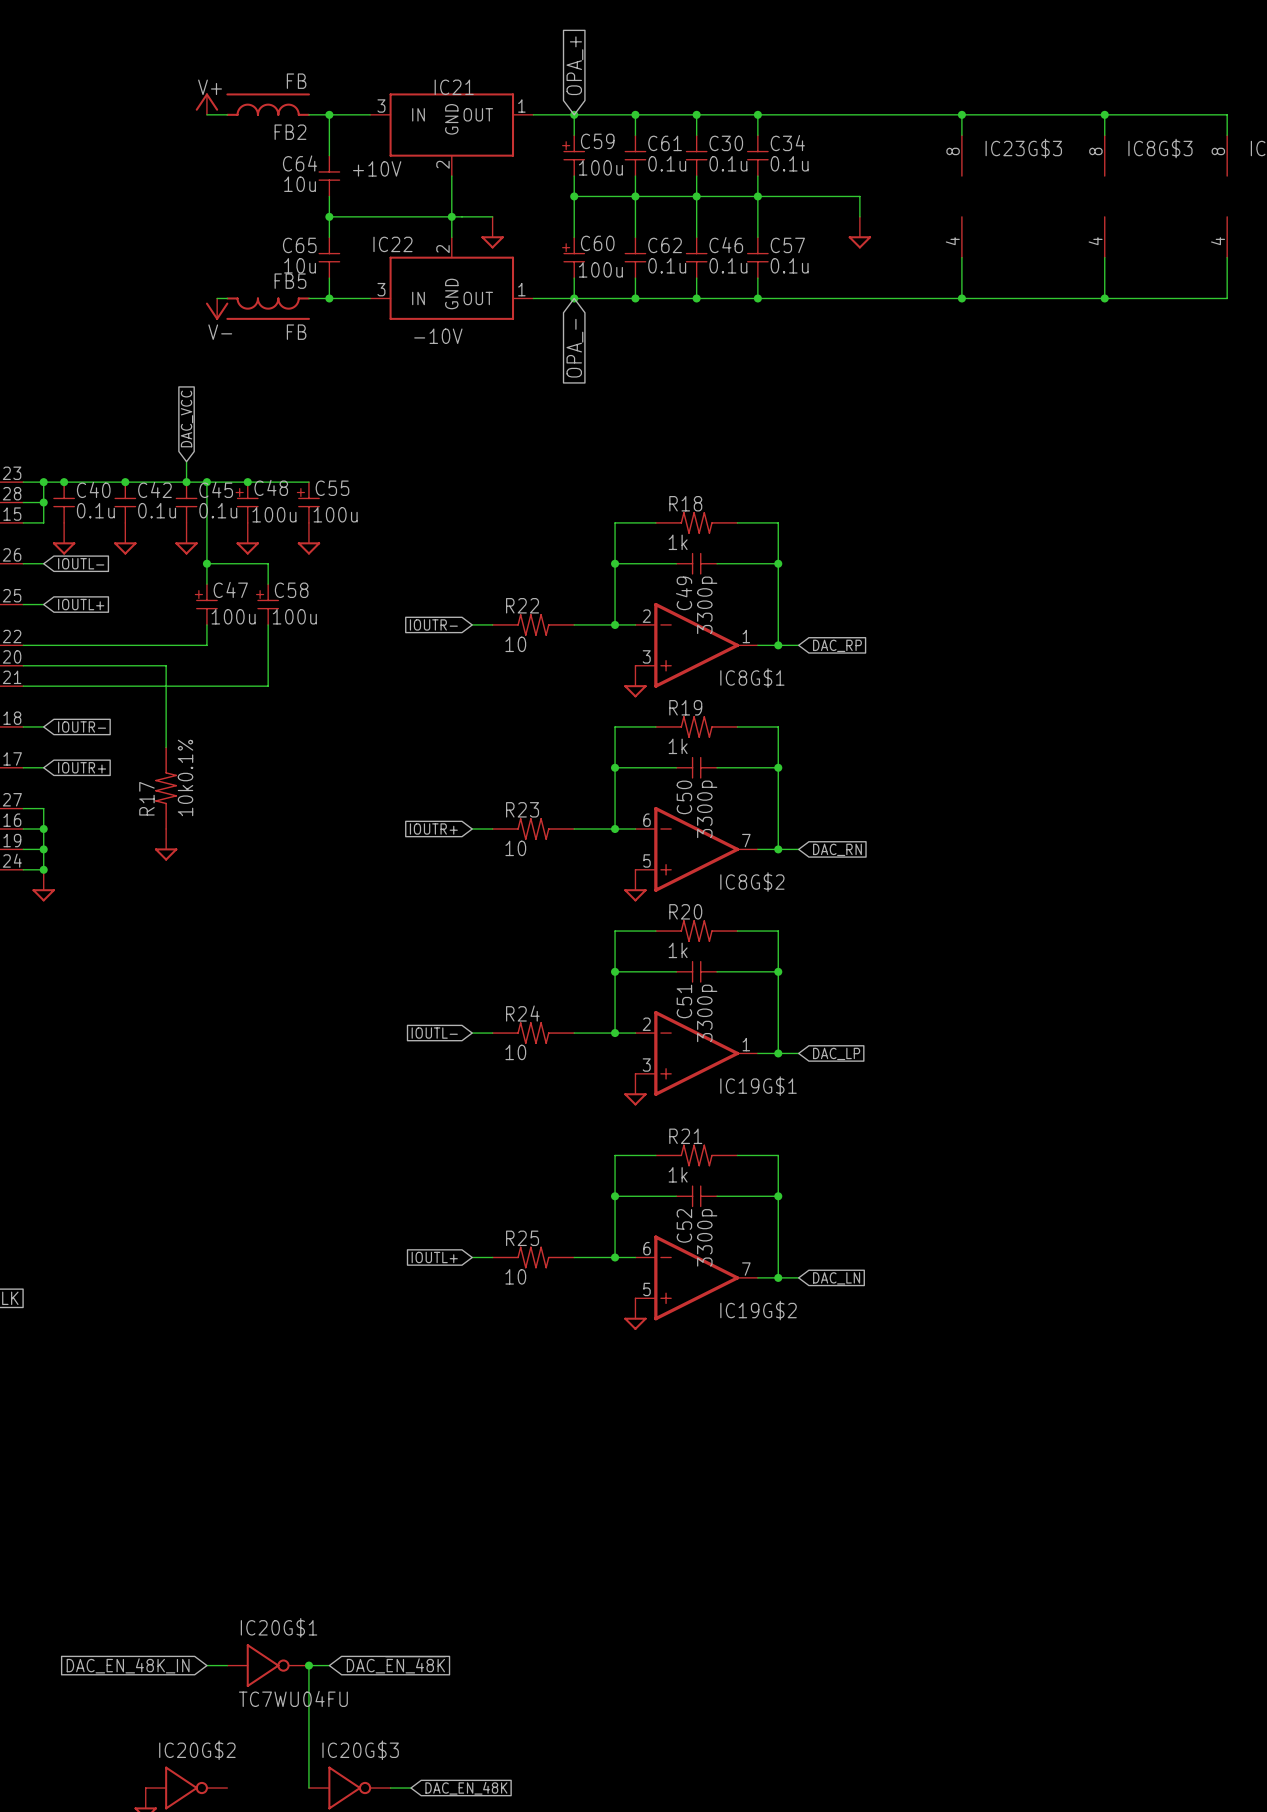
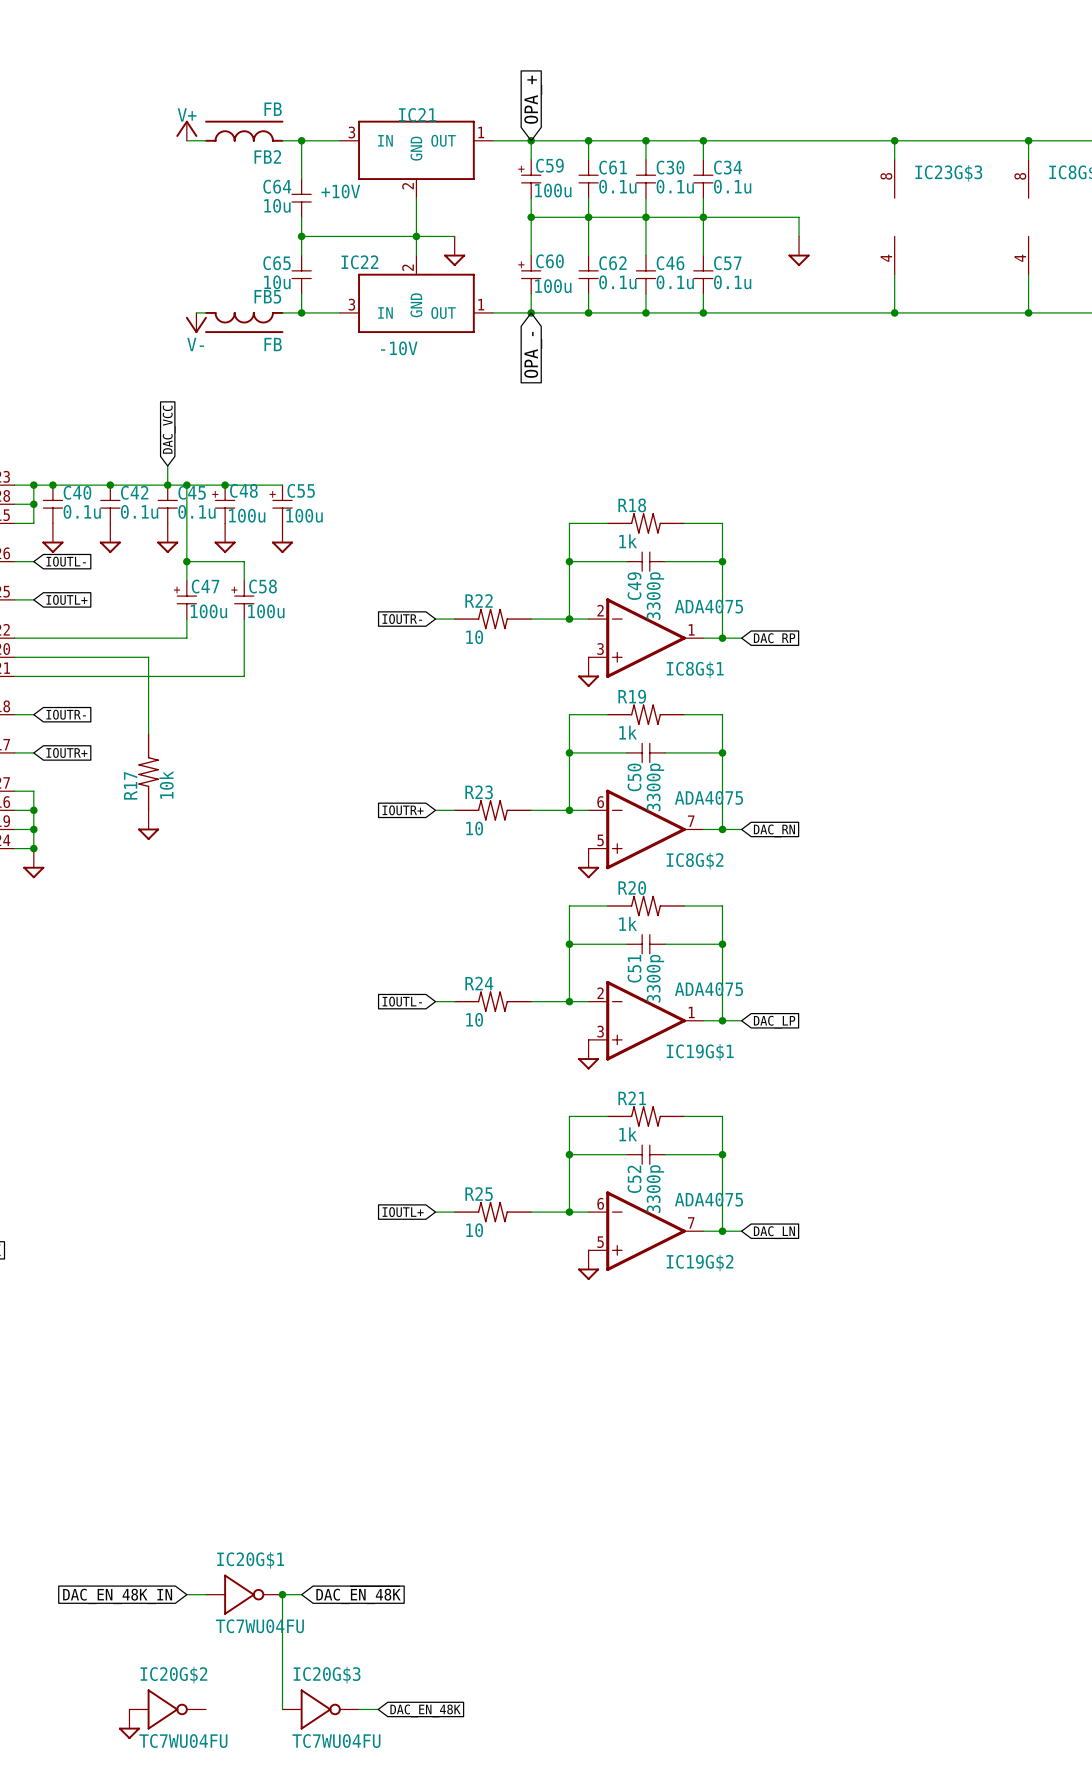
IC8G$1 value: none -> ADA4075 (708, 606)
R17 value: 10k0.1% (185, 777) -> 10k (166, 784)
IC8G$2 value: none -> ADA4075 (708, 797)
IC19G$1 value: none -> ADA4075 (708, 989)
IC19G$2 value: none -> ADA4075 (708, 1199)

